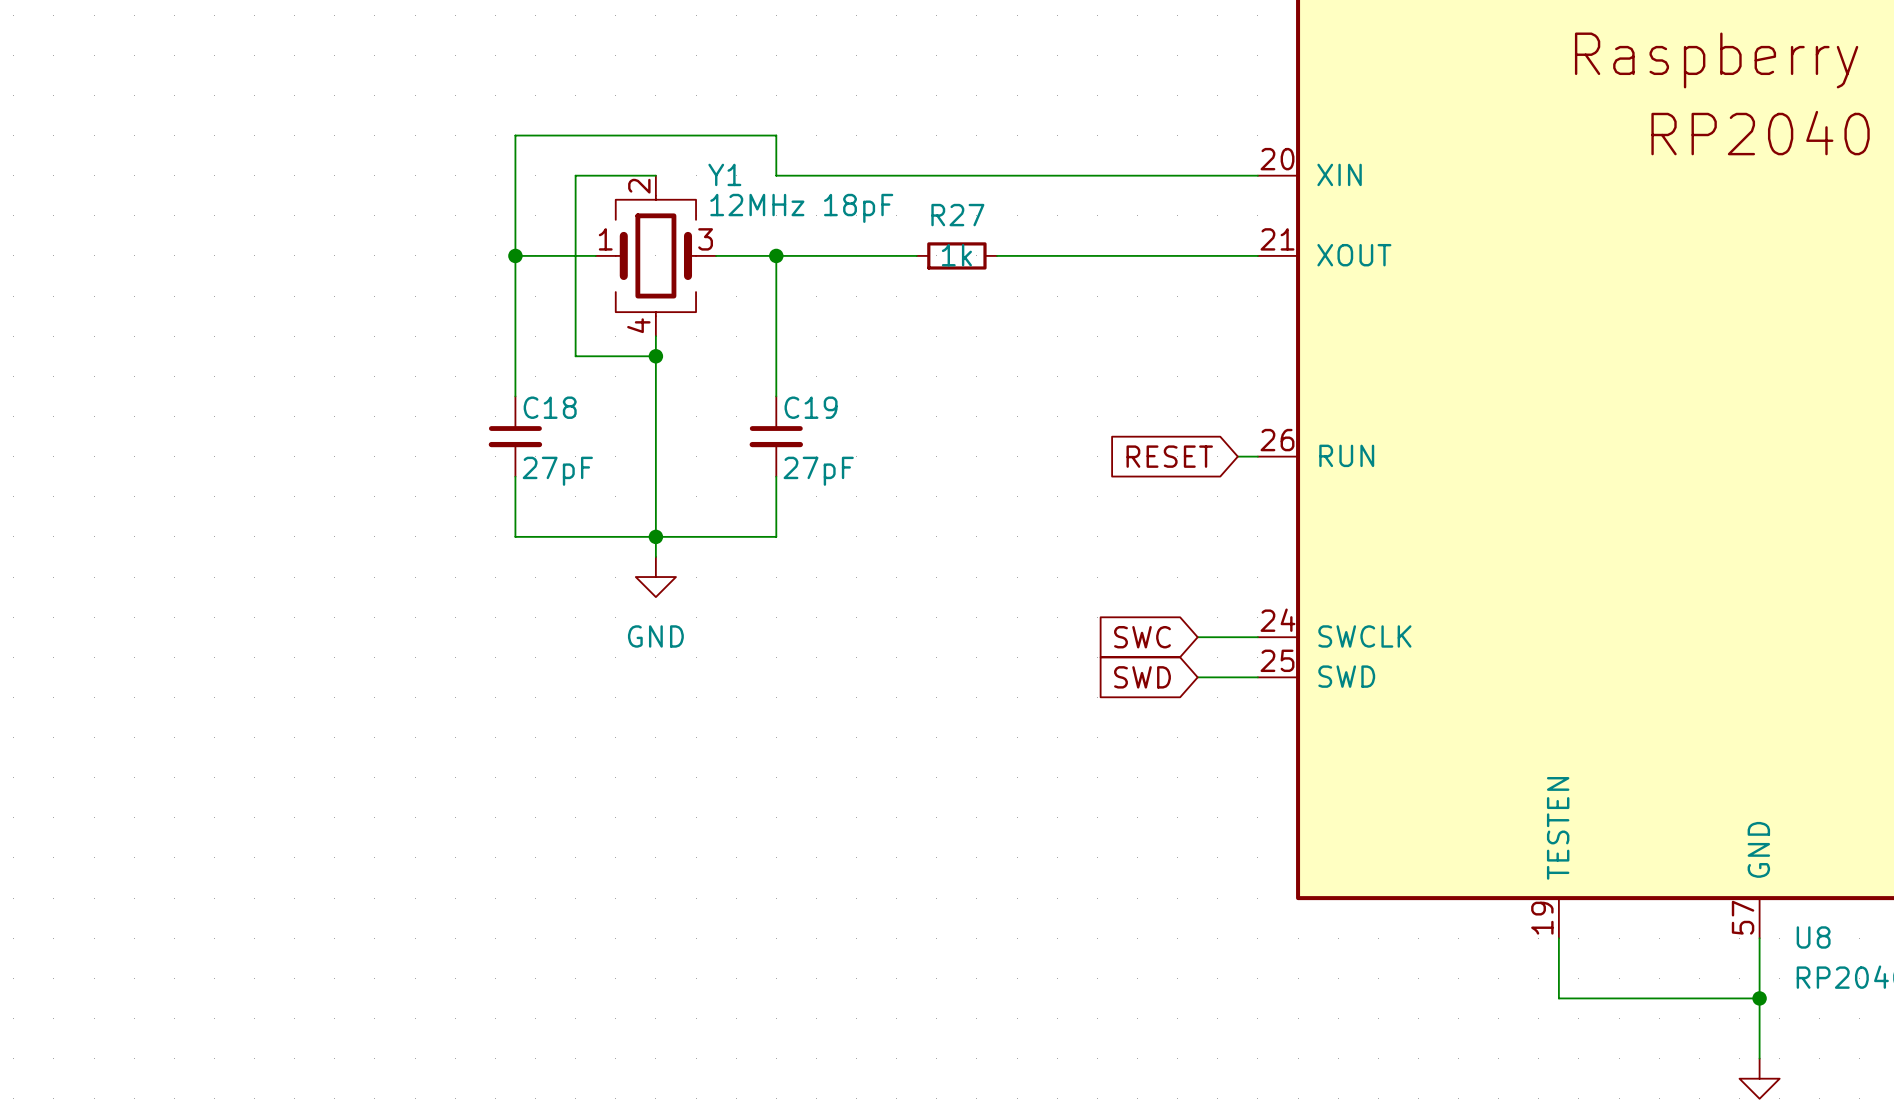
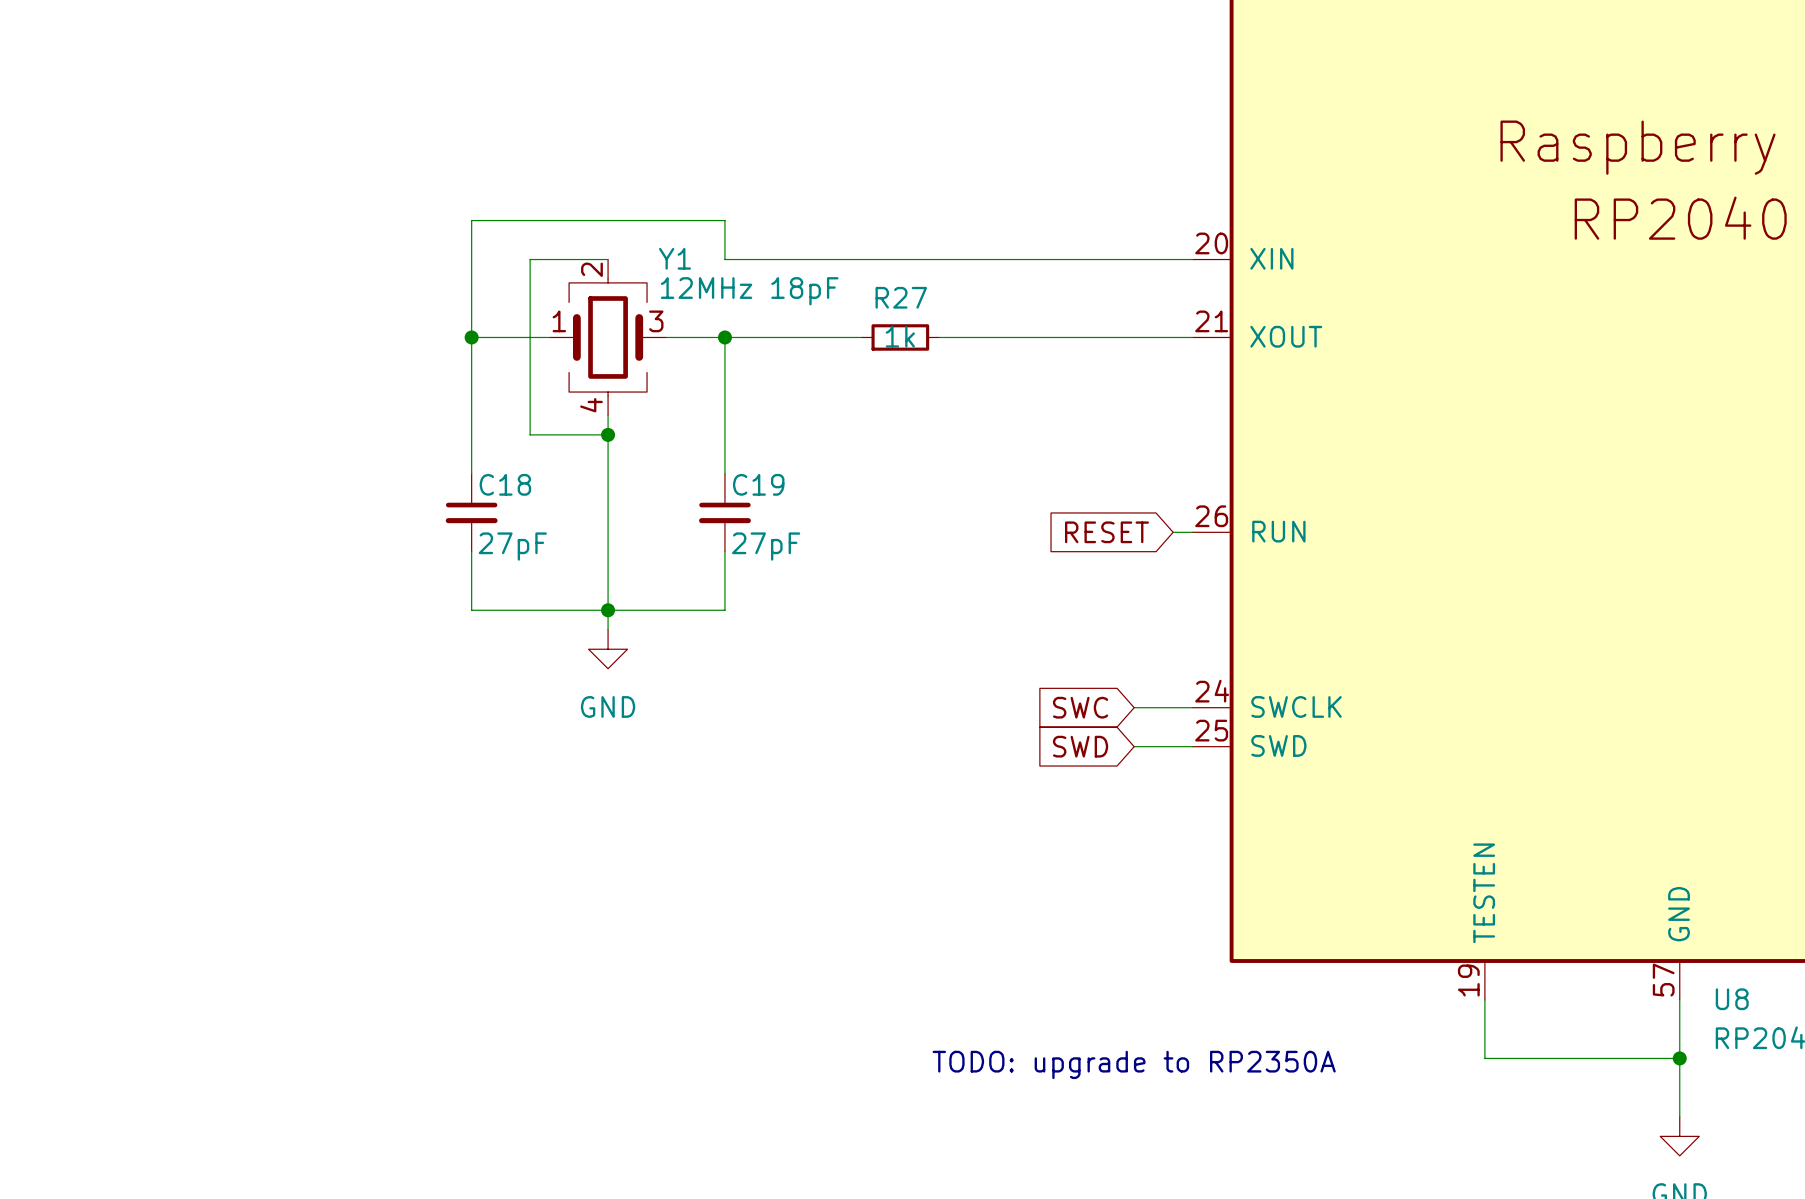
text: none -> TODO: upgrade to RP2350A (1134, 1064)

